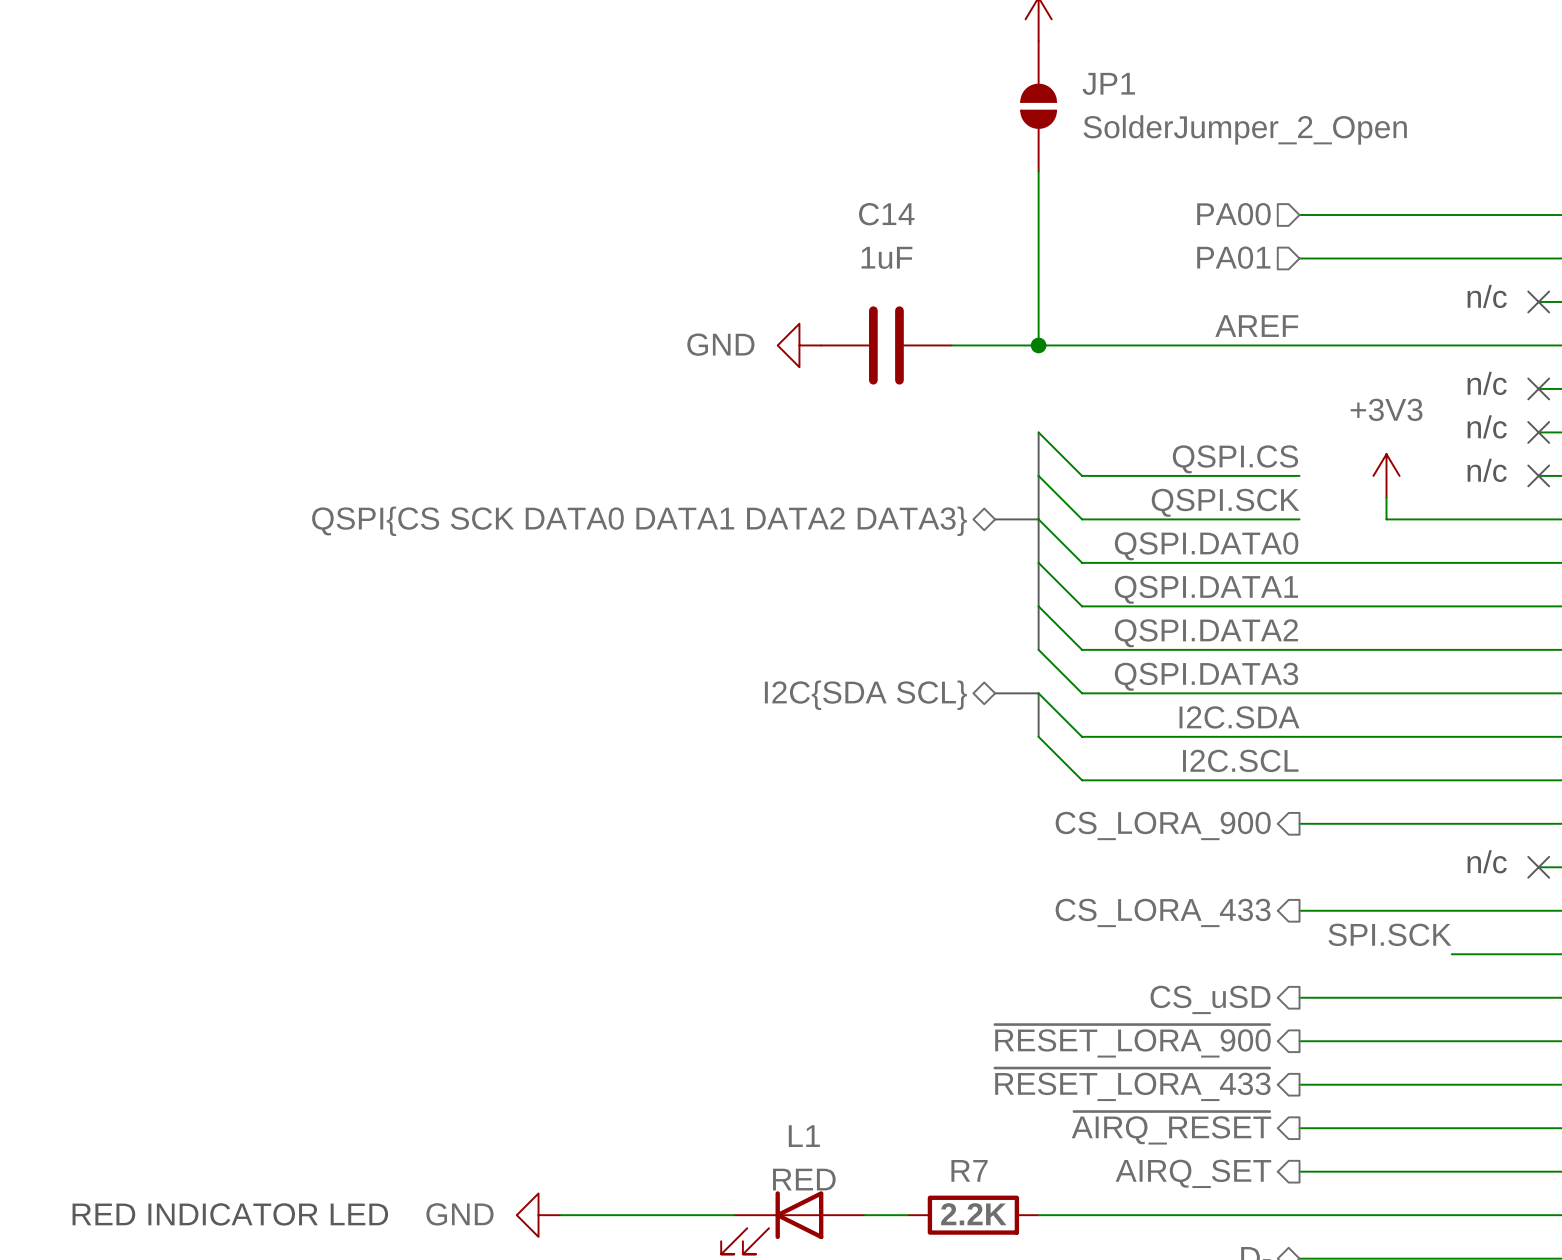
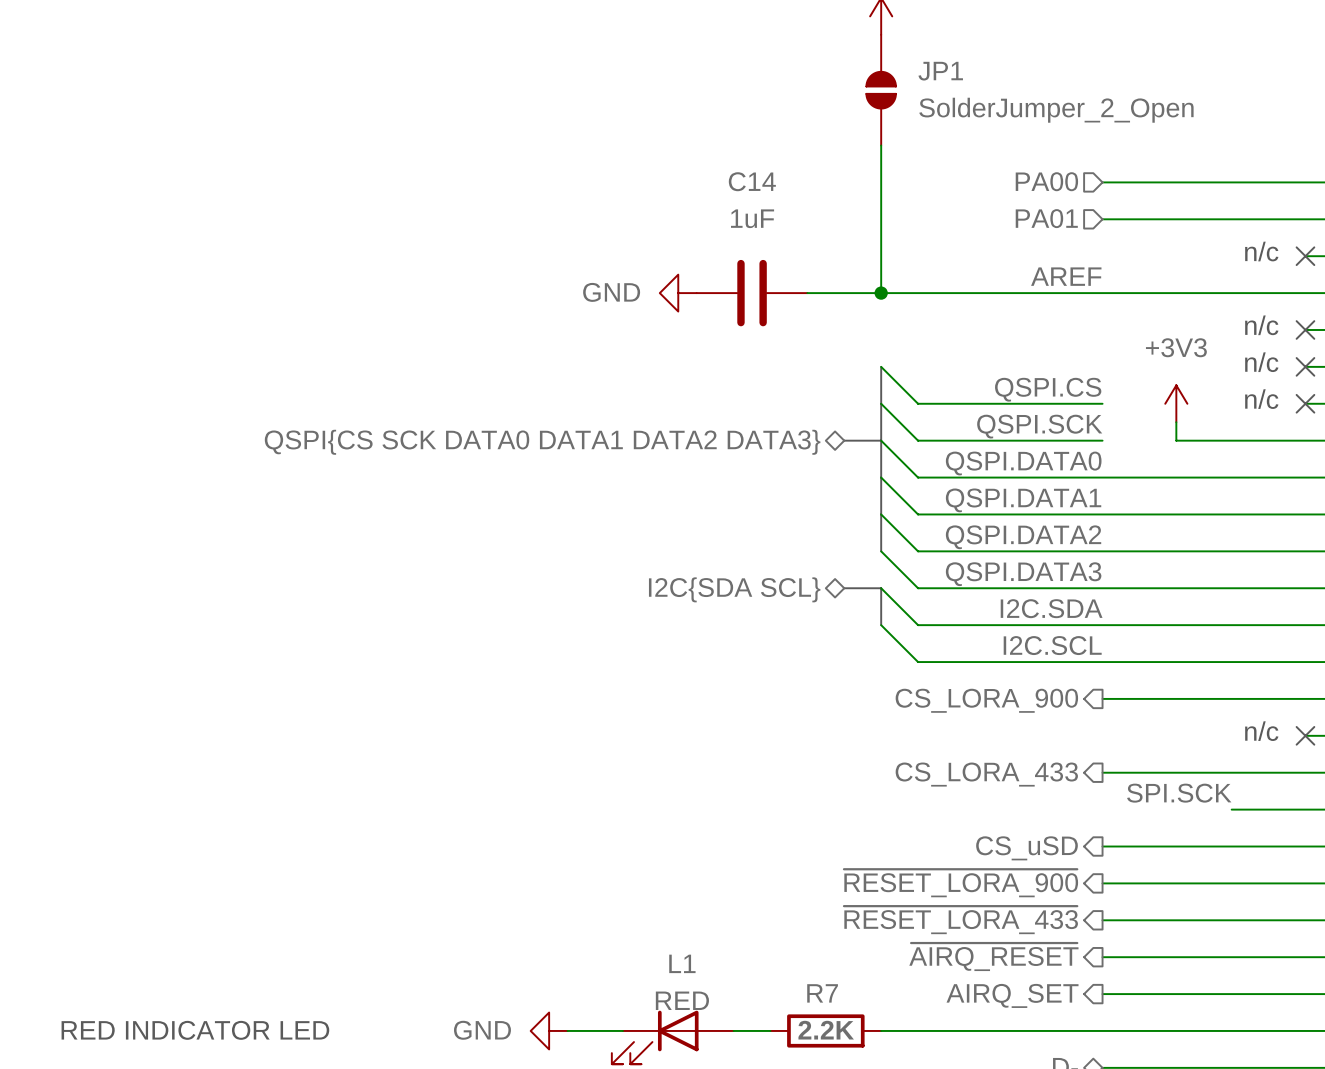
power symbol position: GND (538, 1215) -> GND (549, 1030)
wire: (560, 1215) (668, 1215) -> none

